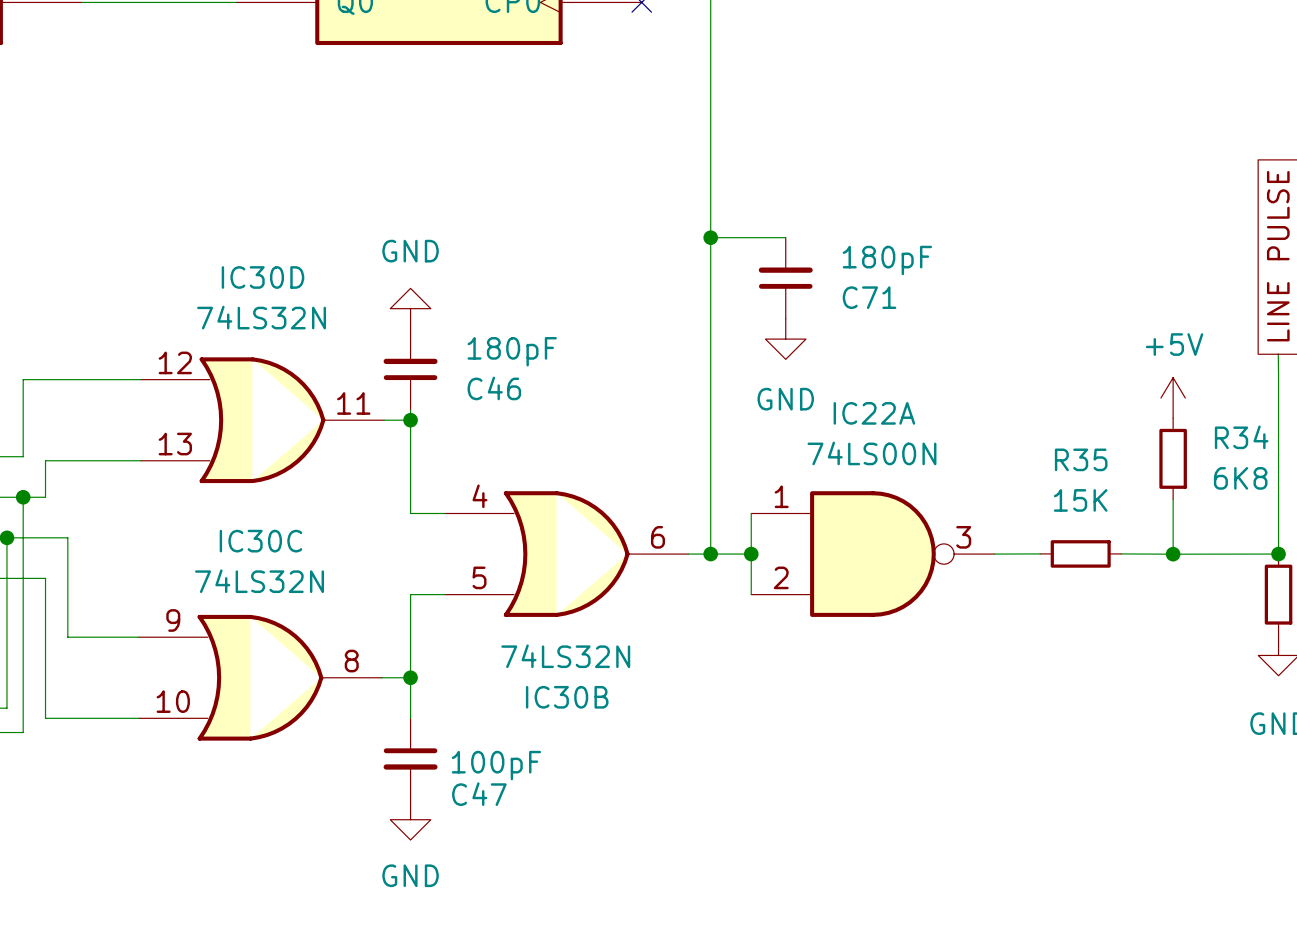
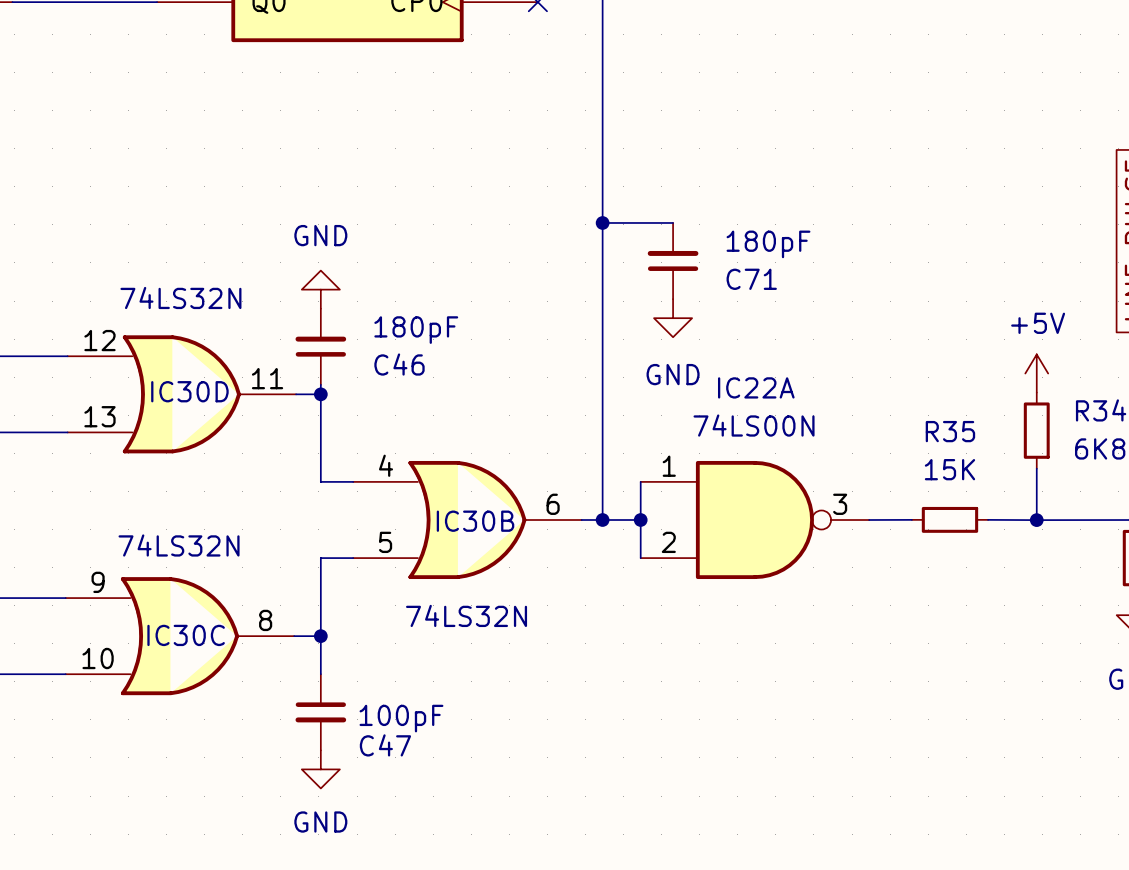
IC30D name position: IC30D (262, 277) -> IC30D (189, 391)
IC30C name position: IC30C (260, 541) -> IC30C (186, 635)
IC30B name position: IC30B (567, 697) -> IC30B (475, 521)

